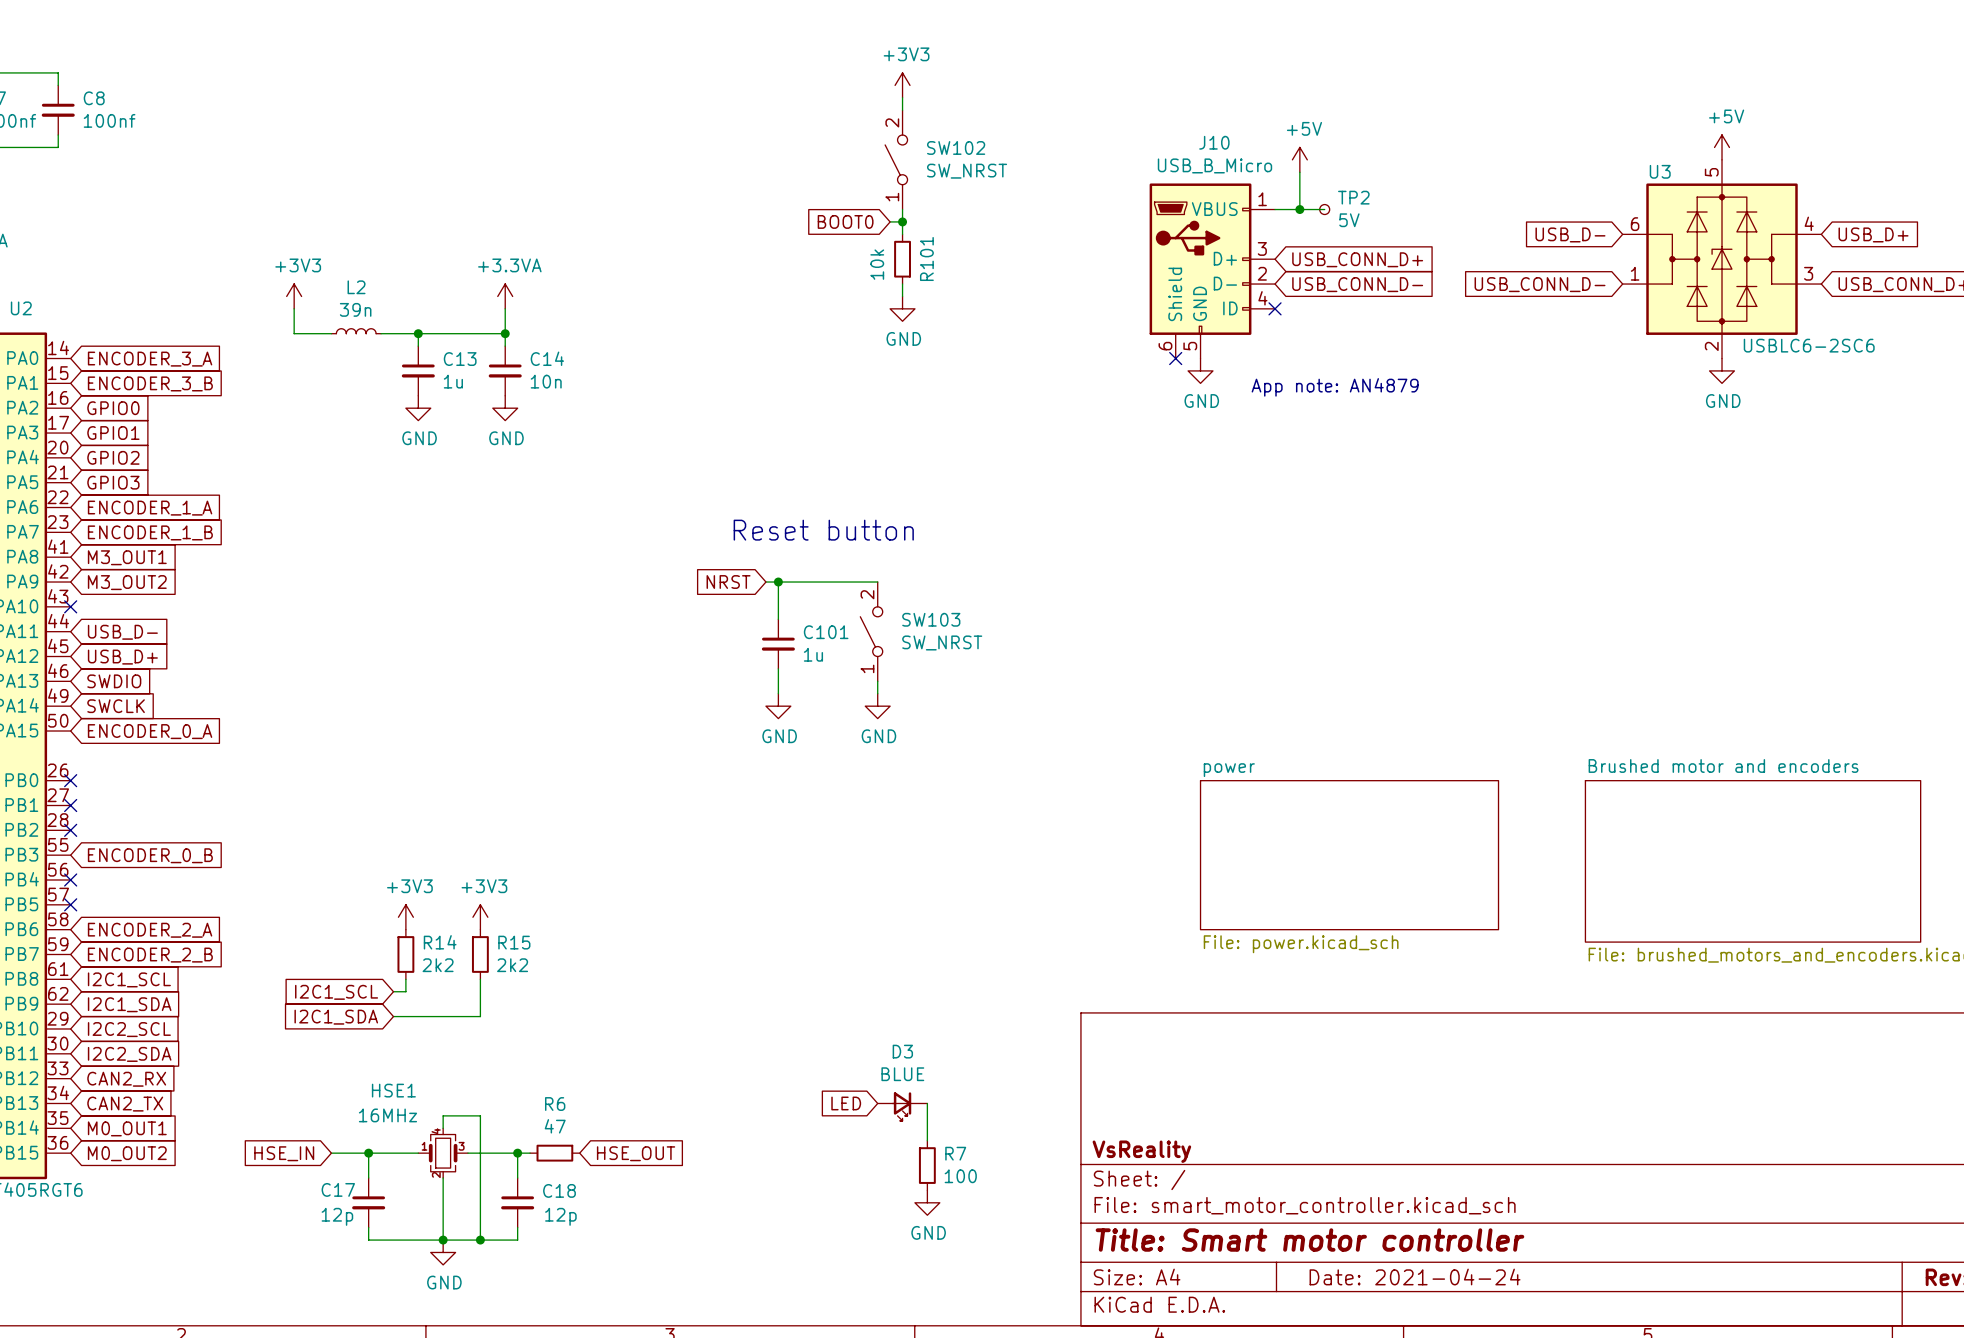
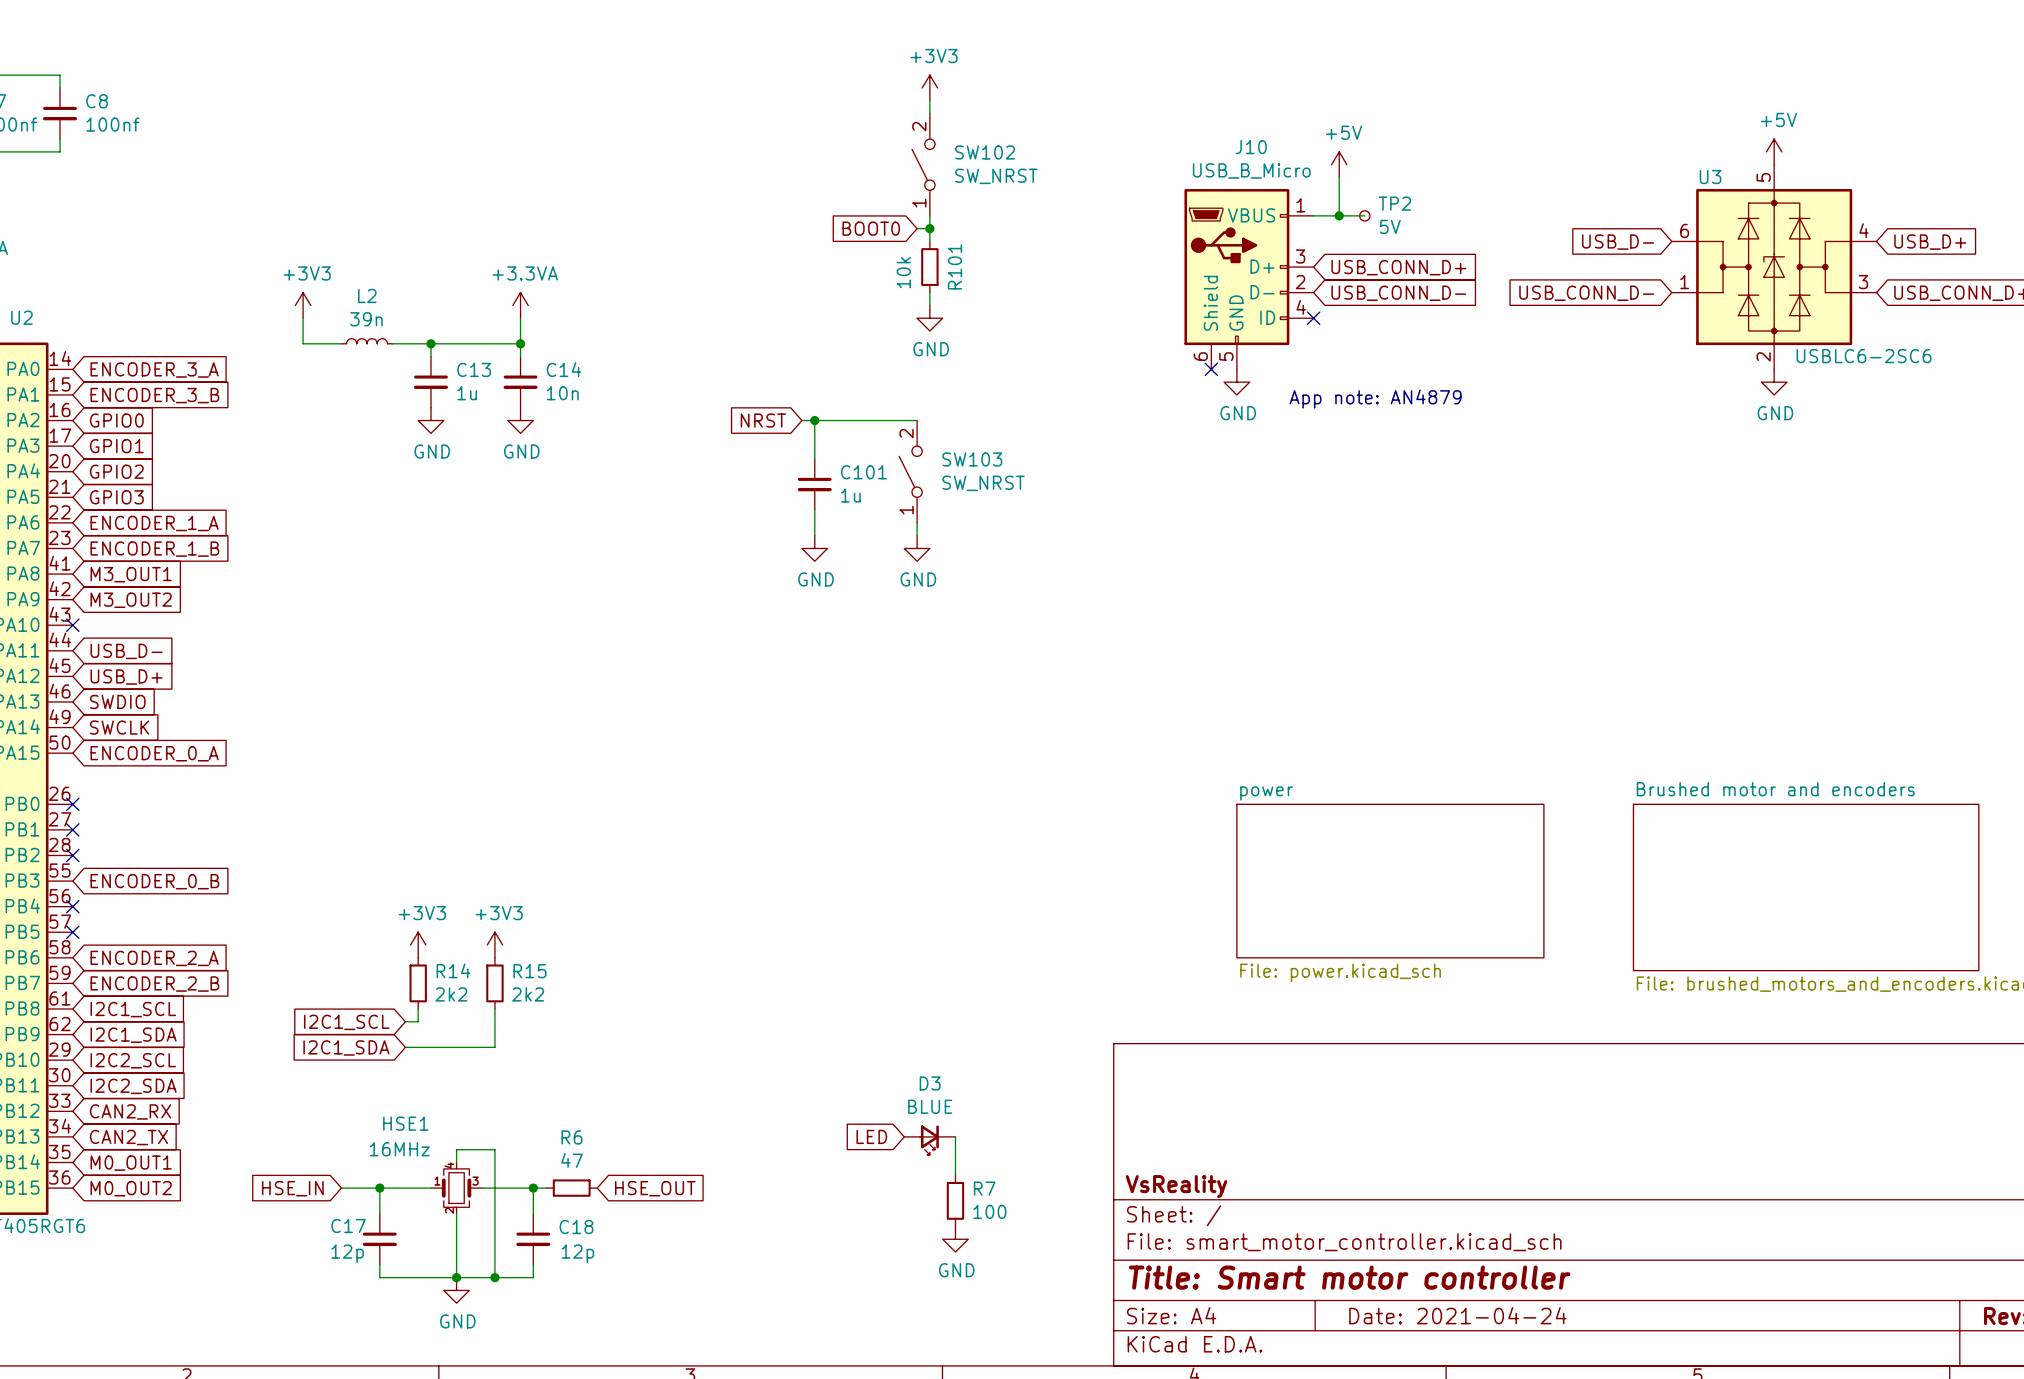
junction: none -> (814, 420)
text: Reset button (823, 530) -> none
power symbol: none -> GND (814, 548)
power symbol: none -> GND (917, 548)
global label position: NRST (728, 582) -> NRST (763, 420)
wire: (765, 582) (877, 582) -> (801, 420) (917, 420)
wire: (778, 582) (778, 619) -> (814, 420) (814, 458)
junction: (778, 582) -> none
SW103 position: (871, 631) -> (910, 471)
C101 position: (778, 644) -> (814, 484)
wire: (778, 668) (778, 693) -> (814, 510) (814, 535)
wire: (877, 681) (877, 693) -> (917, 522) (917, 535)
power symbol: GND (778, 706) -> none
power symbol: GND (877, 706) -> none

